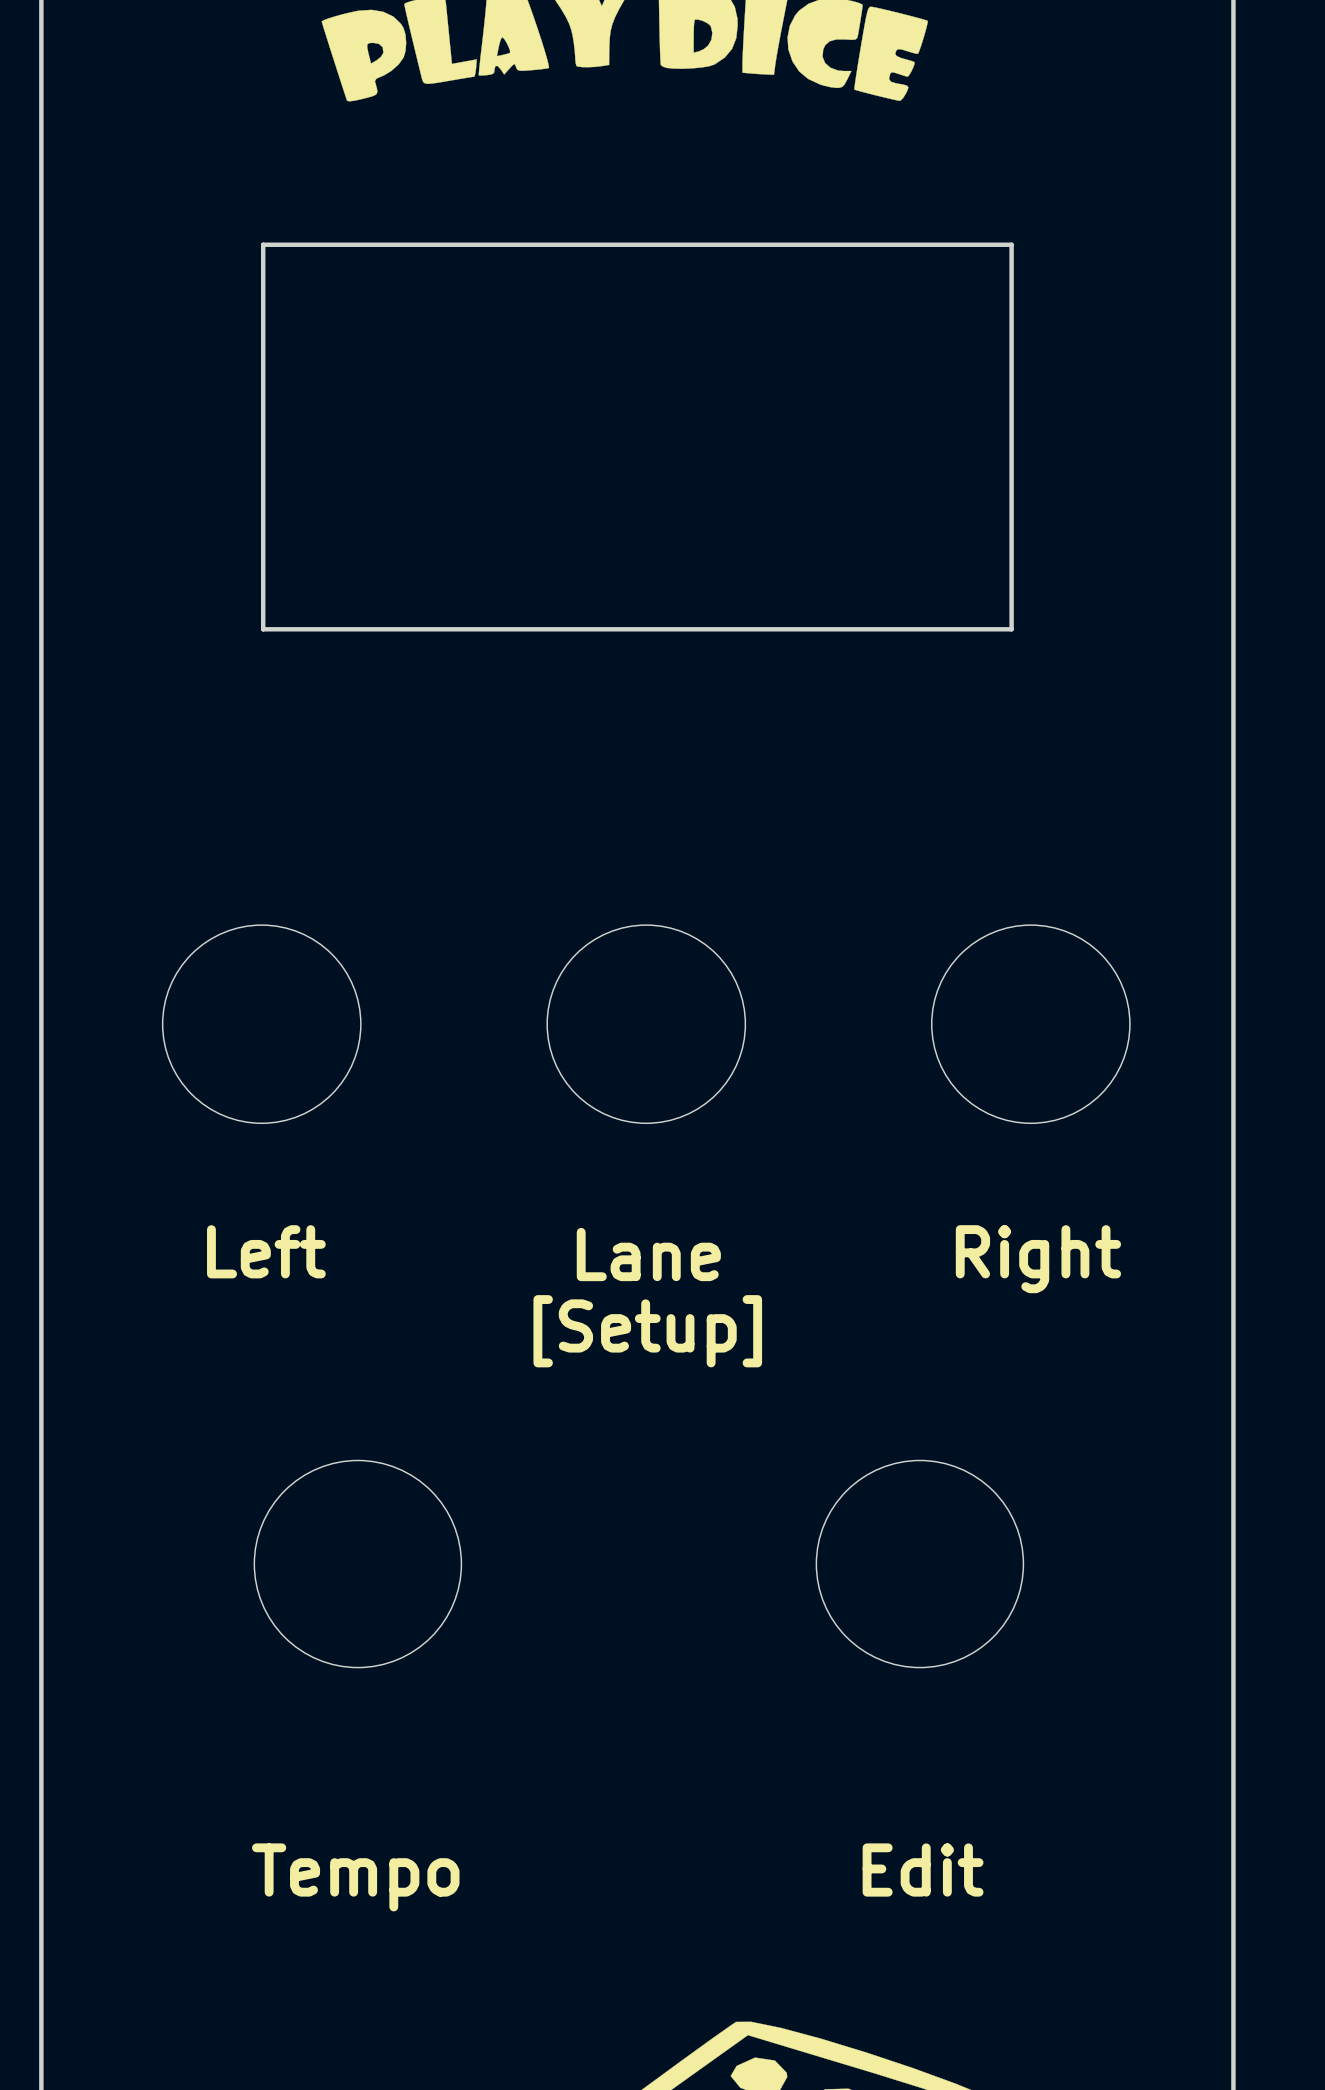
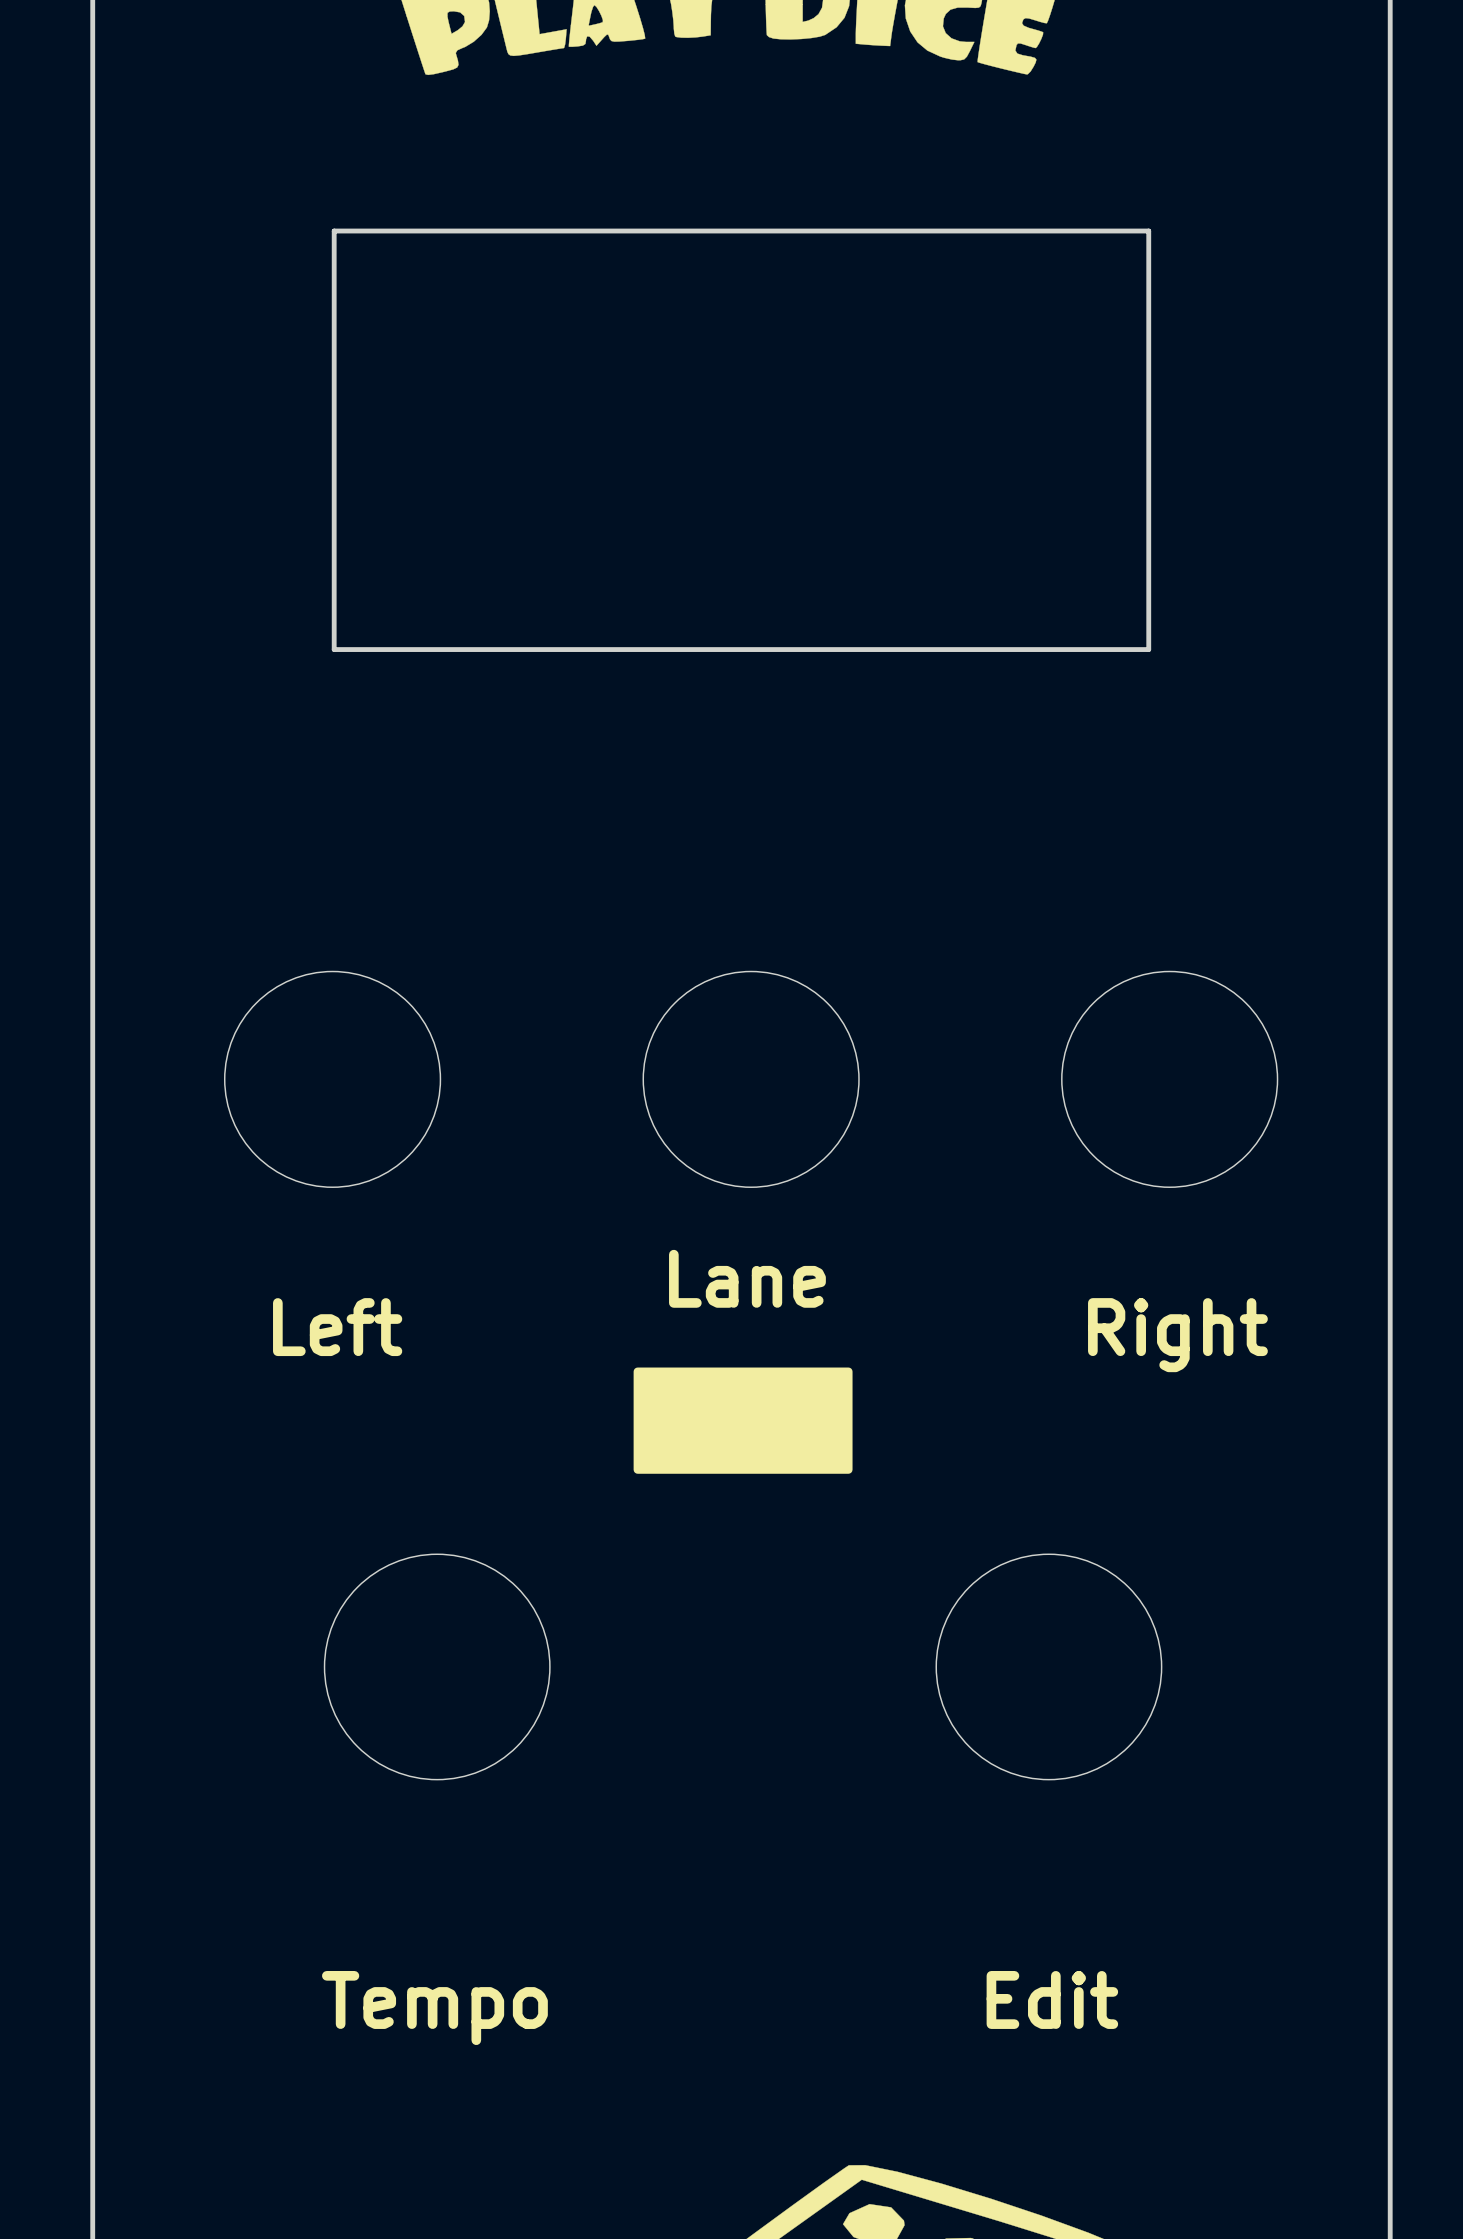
text position: Lane (648, 1254) -> Lane (747, 1278)
drawing: none -> [633, 1367, 853, 1474]
text: [Setup] (647, 1331) -> none

